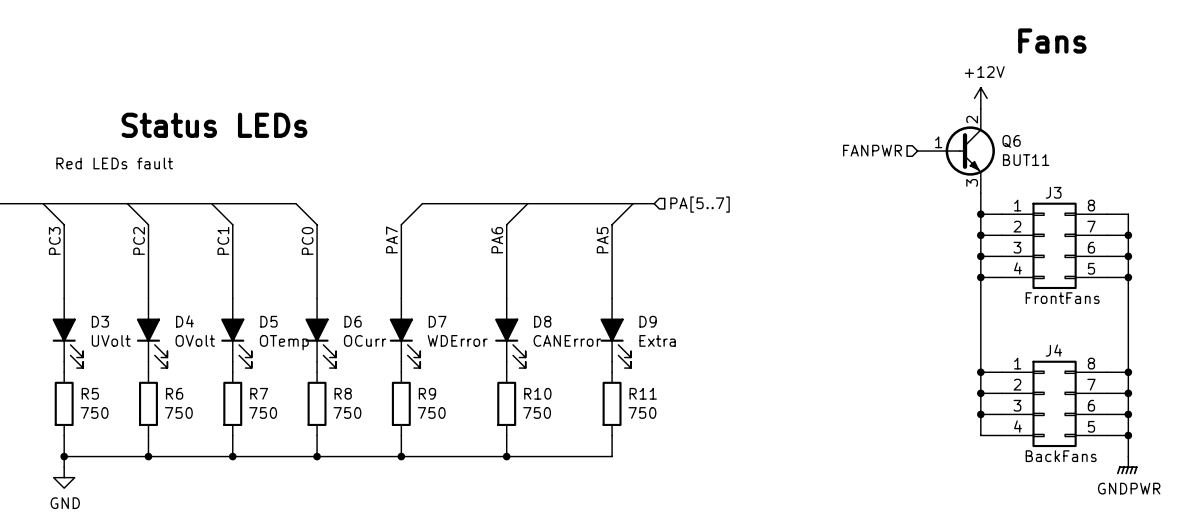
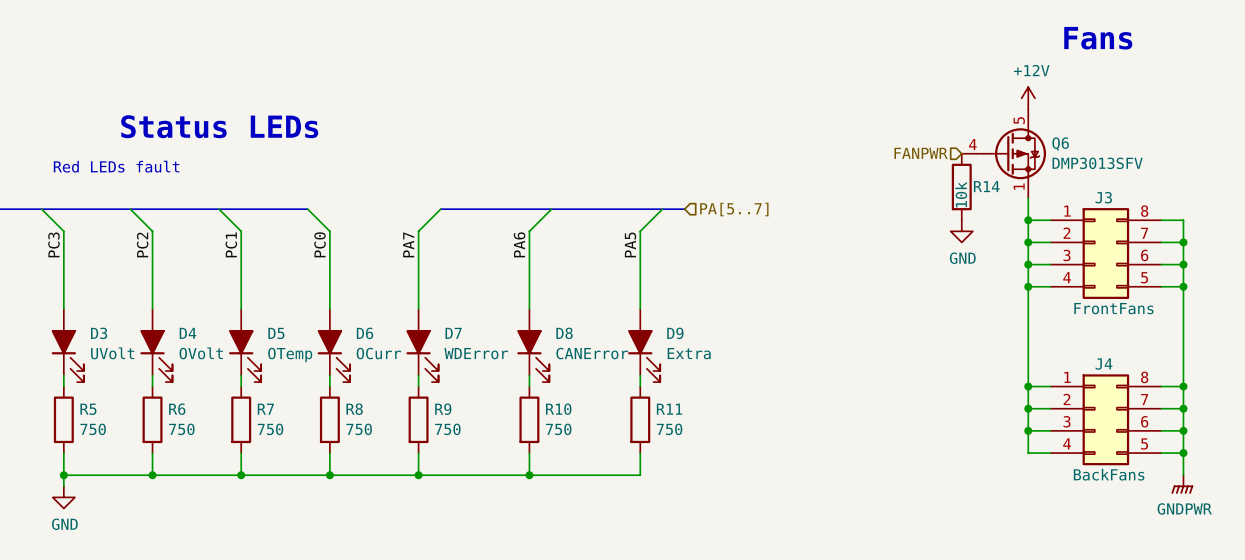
Q6 symbol: [917, 108, 995, 194] -> [961, 109, 1047, 199]
Q6 value: BUT11 (1026, 160) -> DMP3013SFV (1097, 163)
R14: none -> 10k (961, 187)
power symbol: none -> GND (961, 231)

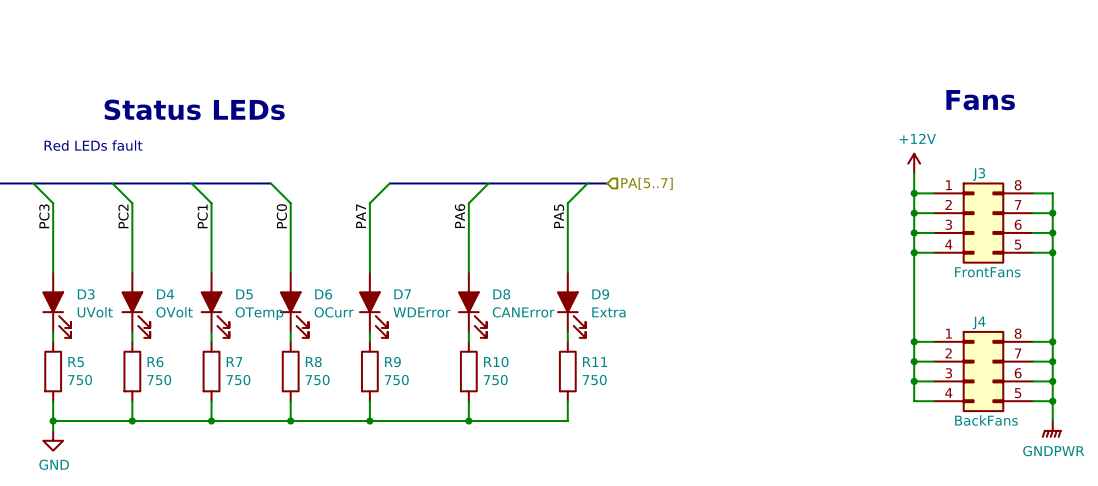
text position: Fans (1098, 38) -> Fans (980, 100)
power symbol position: +12V (1028, 98) -> +12V (914, 163)
hierarchical label: FANPWR (921, 153) -> none
Q6: DMP3013SFV (1003, 153) -> none
R14: 10k (961, 187) -> none
power symbol: GND (961, 231) -> none

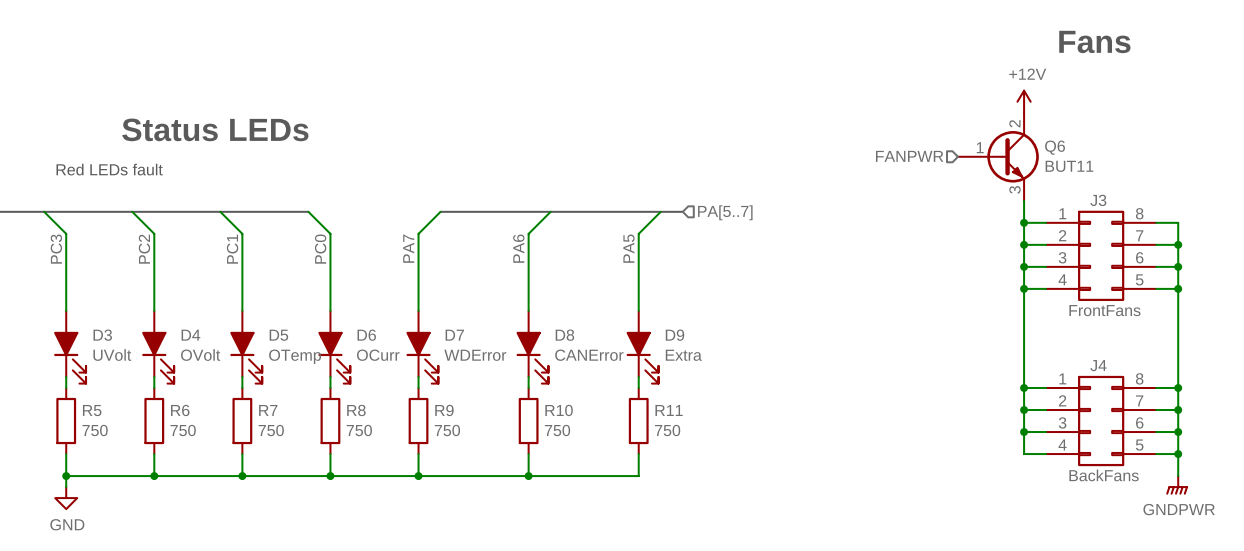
text position: Fans (980, 100) -> Fans (1094, 41)
hierarchical label: none -> FANPWR (909, 156)
Q6: none -> BUT11 (998, 156)
power symbol position: +12V (914, 163) -> +12V (1024, 101)

